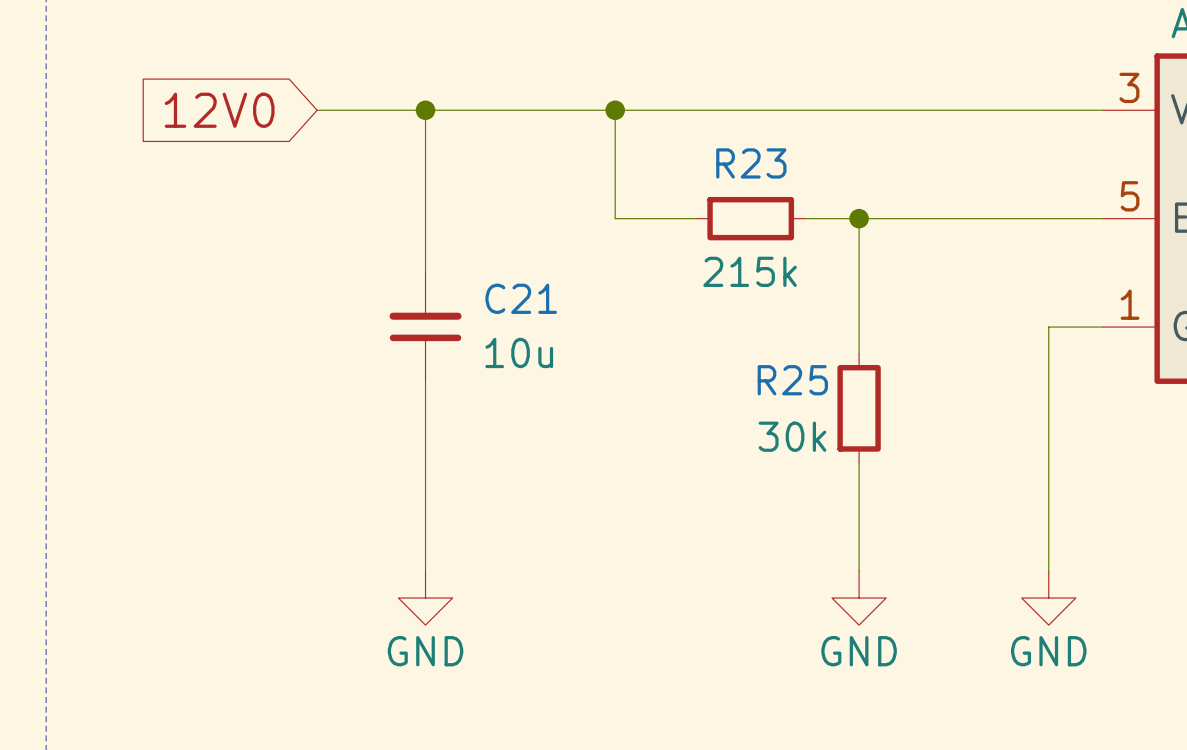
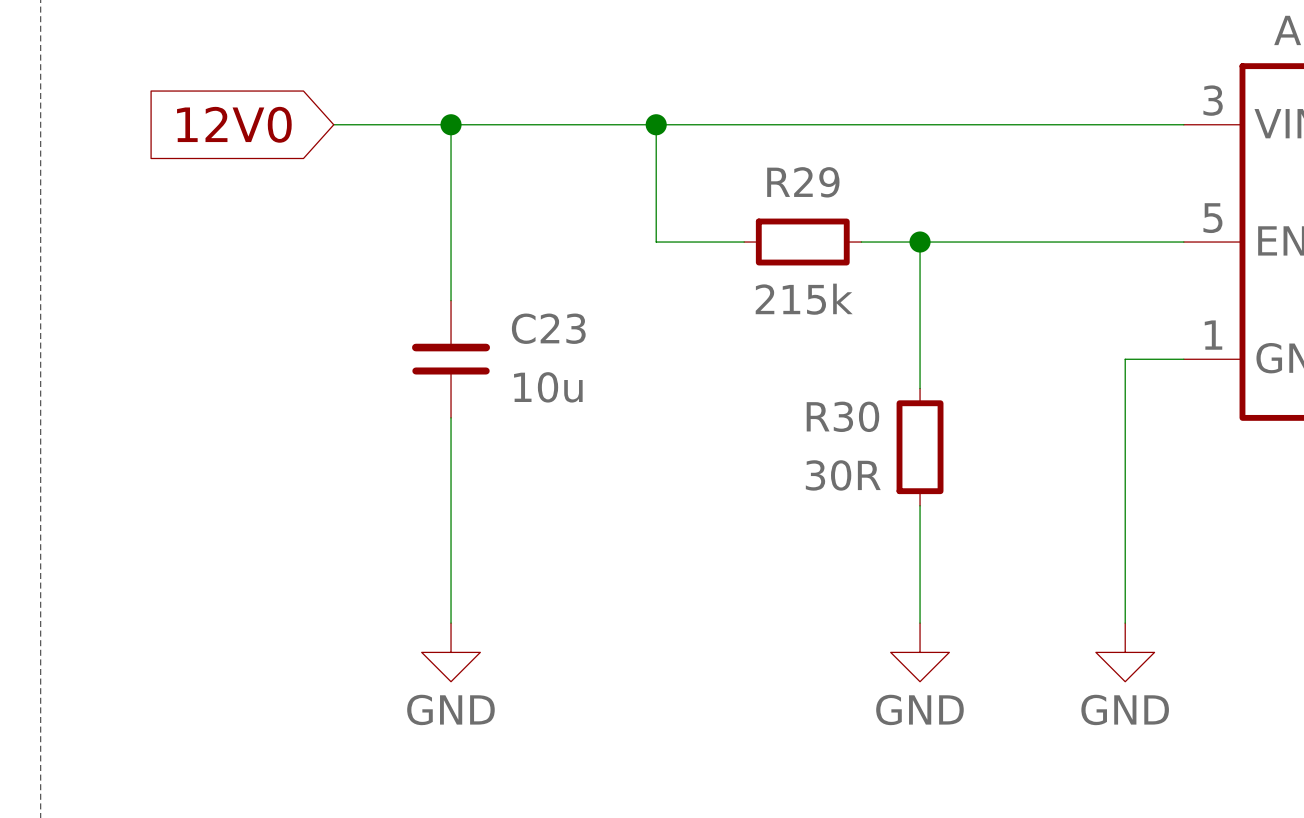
R23 name: R23 (751, 163) -> R29 (803, 182)
C21 name: C21 (521, 298) -> C23 (548, 328)
R25 name: R25 (792, 380) -> R30 (842, 416)
R25 text: 30k (792, 436) -> 30R (843, 475)

